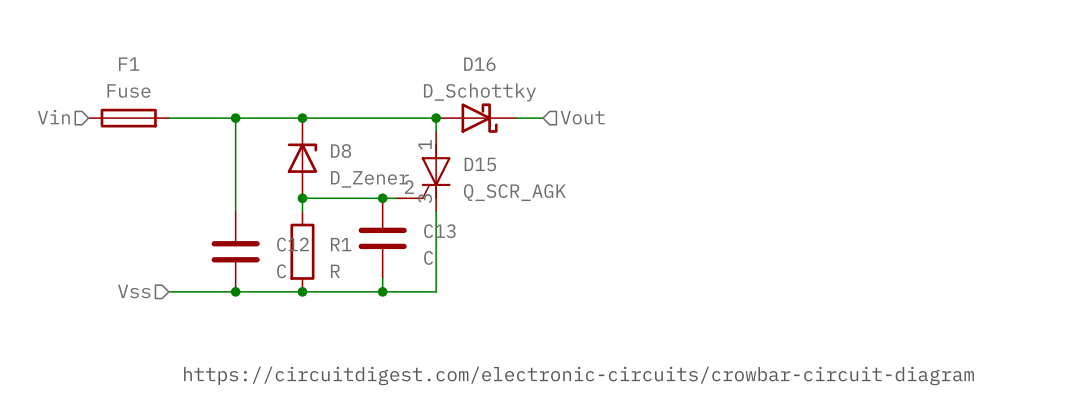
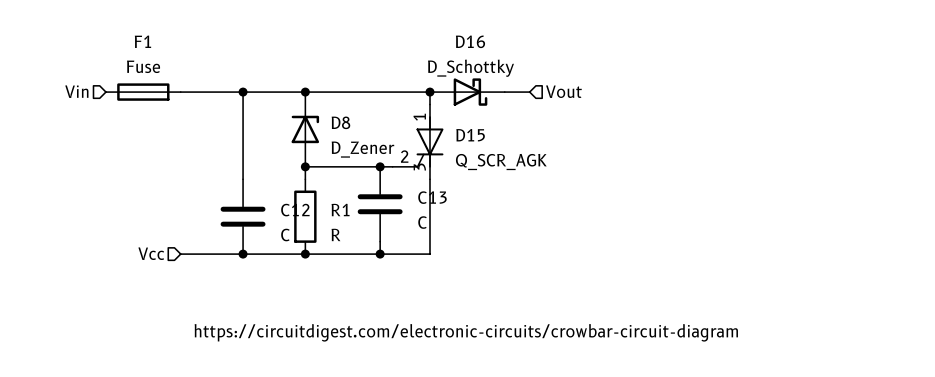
hierarchical label: Vss (134, 291) -> Vcc (151, 253)

